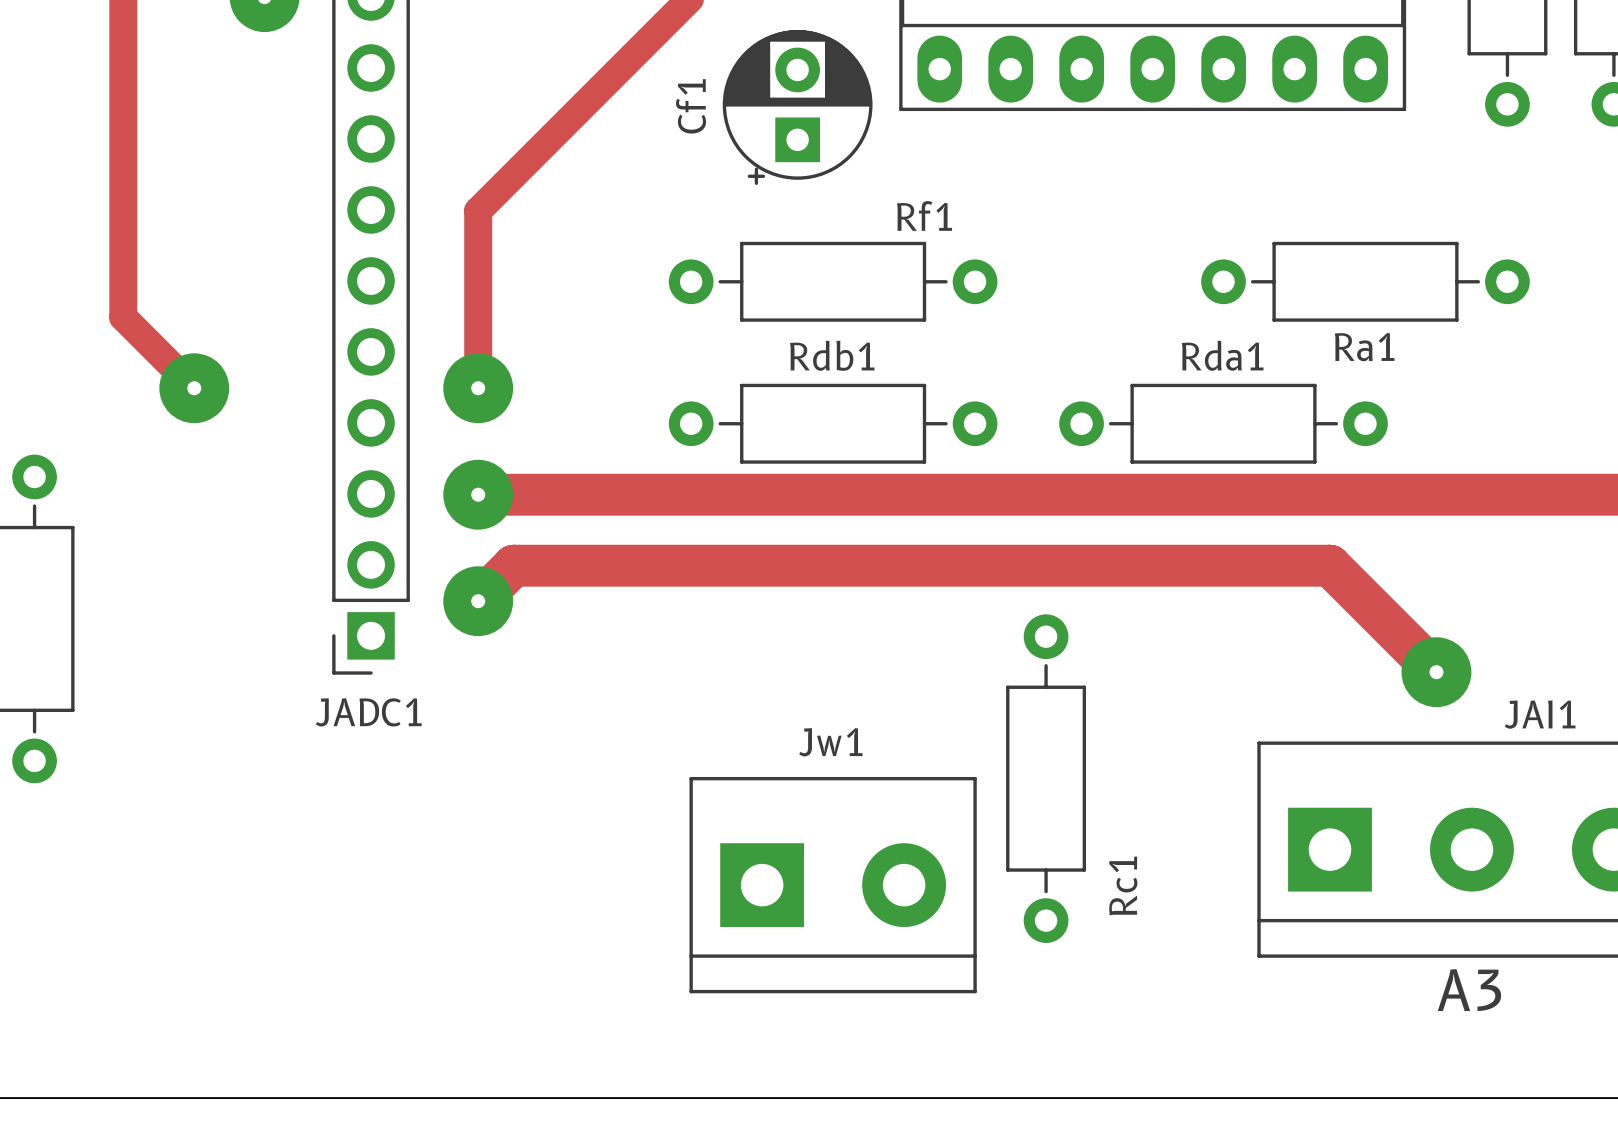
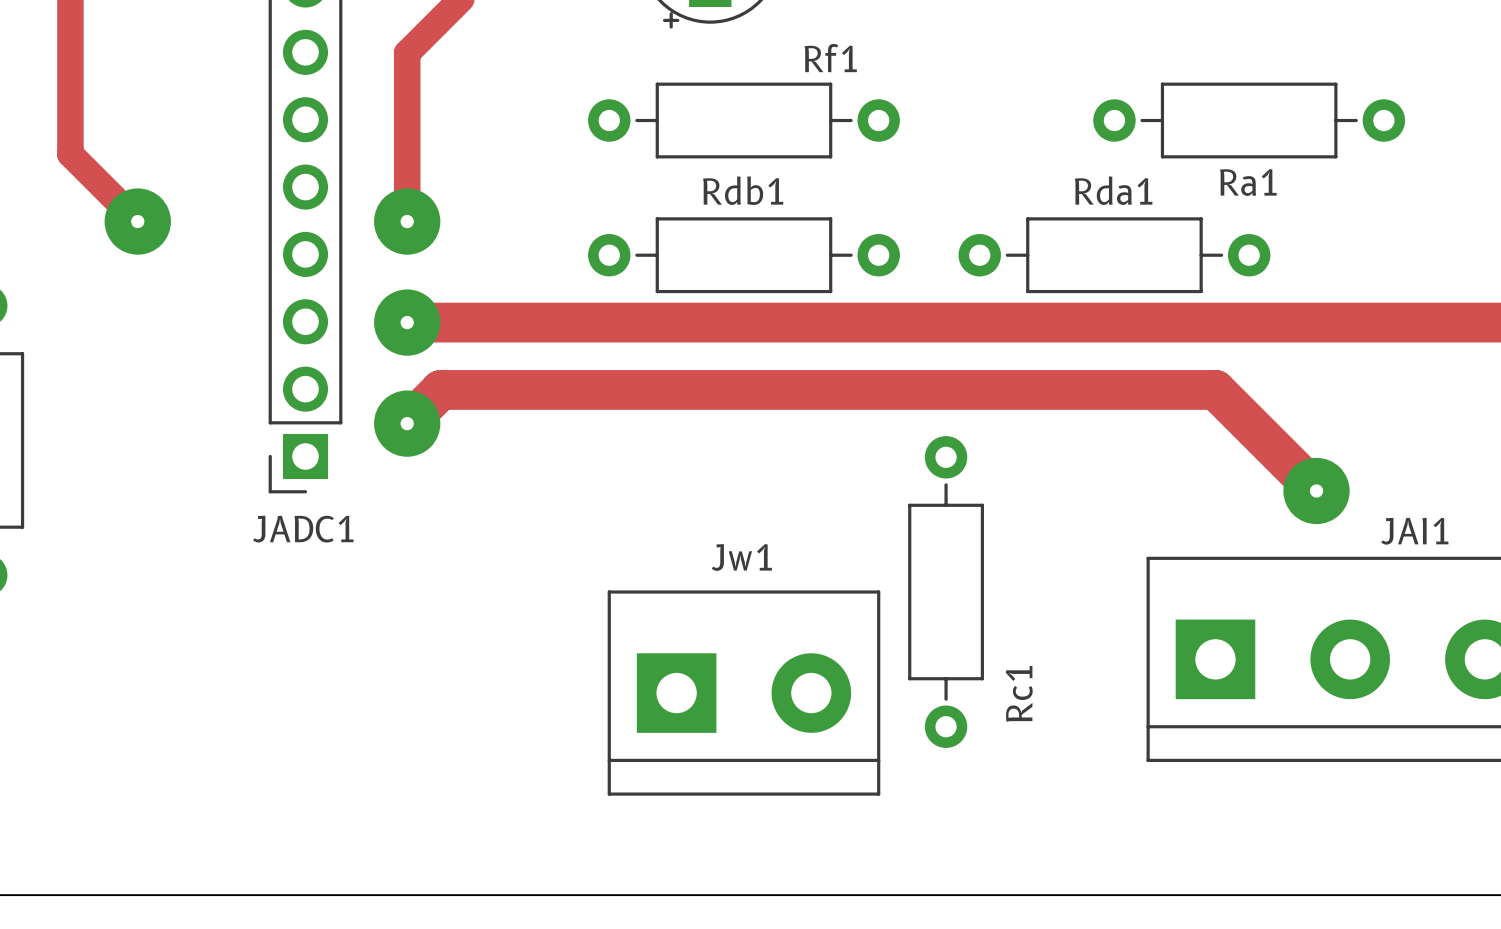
text: A3 (1469, 990) -> none

